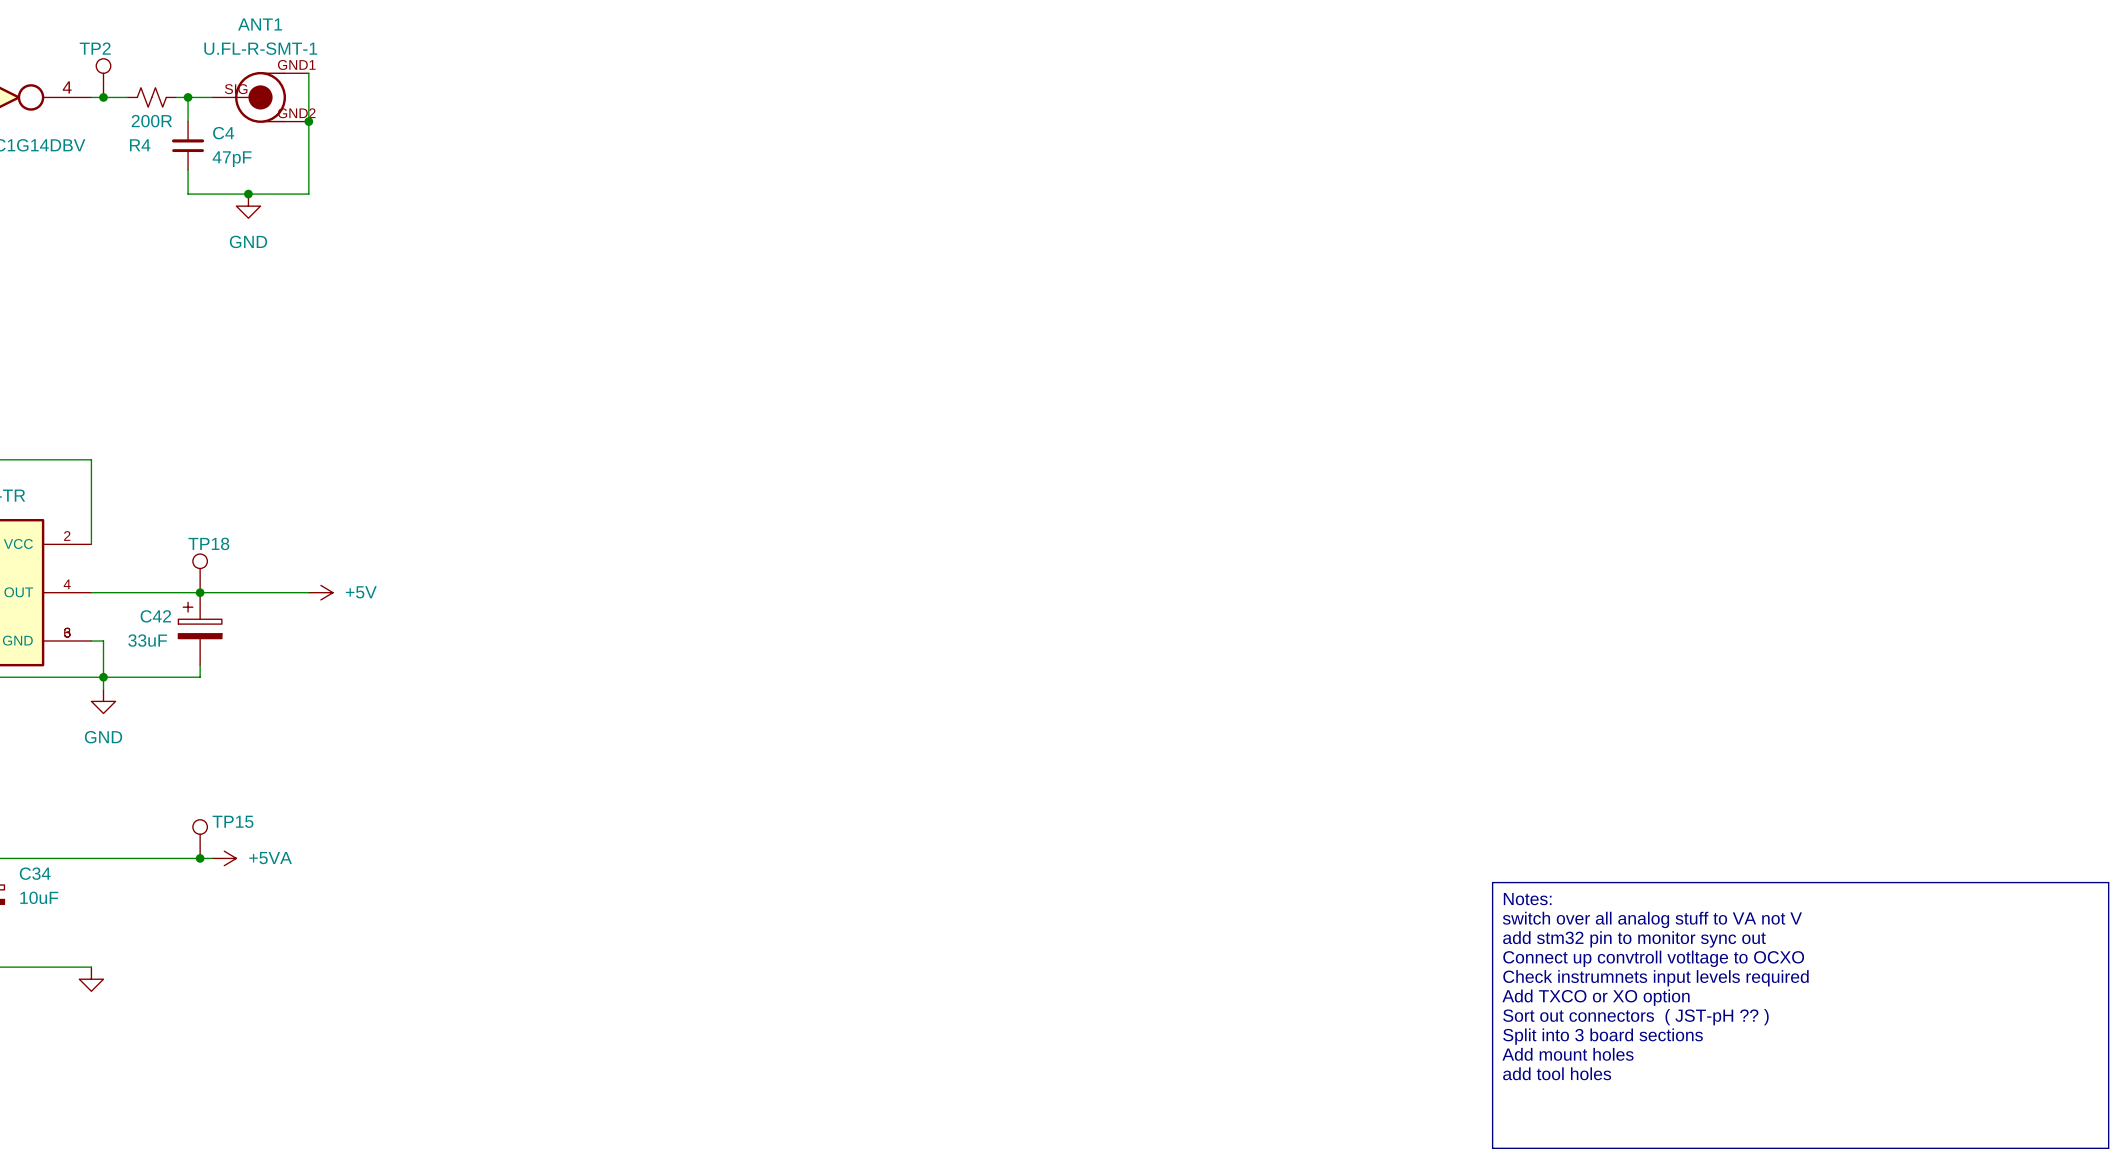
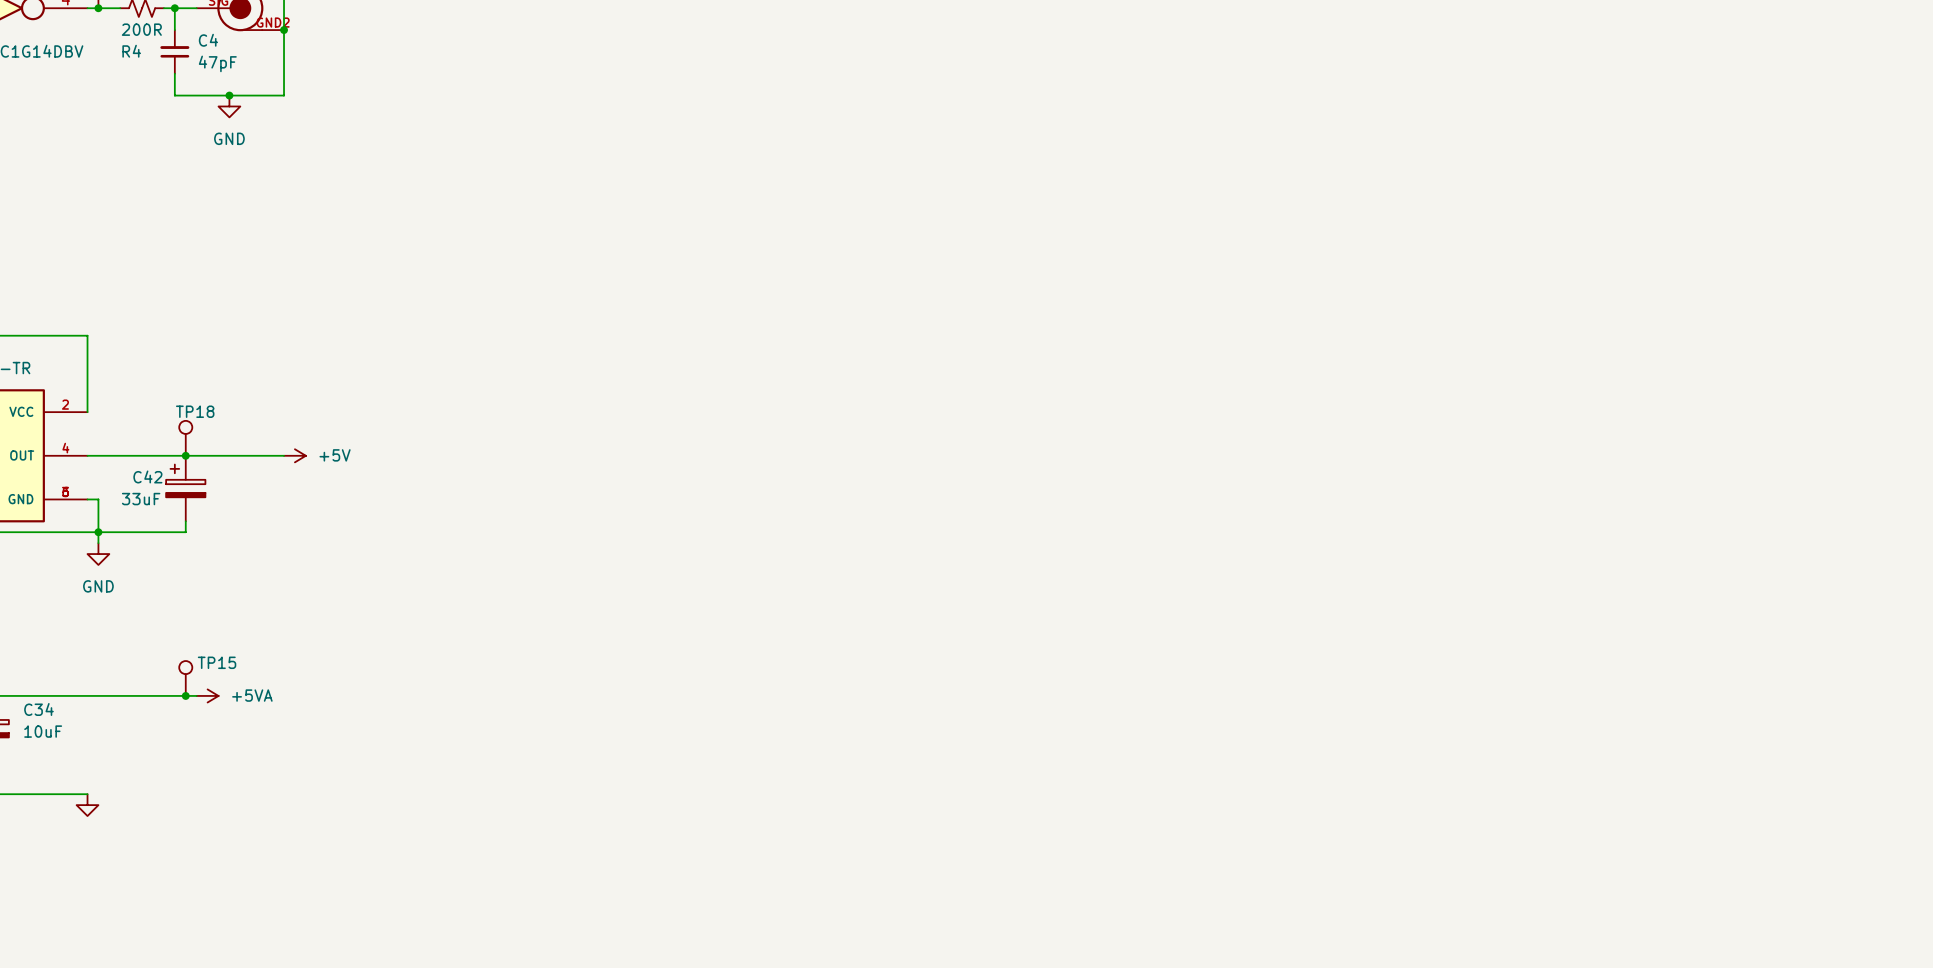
line: (1492, 882) (2108, 882) (2108, 1148) (1492, 1148) (1492, 882) -> none
text: Notes: (1527, 899) -> none
text: switch over all analog stuff to VA not V (1652, 919) -> none
text: add stm32 pin to monitor sync out (1634, 939) -> none
text: Connect up convtroll votltage to OCXO (1653, 958) -> none
text: Check instrumnets input levels required (1655, 978) -> none
text: Add TXCO or XO option (1596, 997) -> none
text: Sort out connectors ( JST-pH ?? ) (1635, 1017) -> none
text: Split into 3 board sections (1603, 1036) -> none
text: Add mount holes (1567, 1054) -> none
text: add tool holes (1557, 1073) -> none

